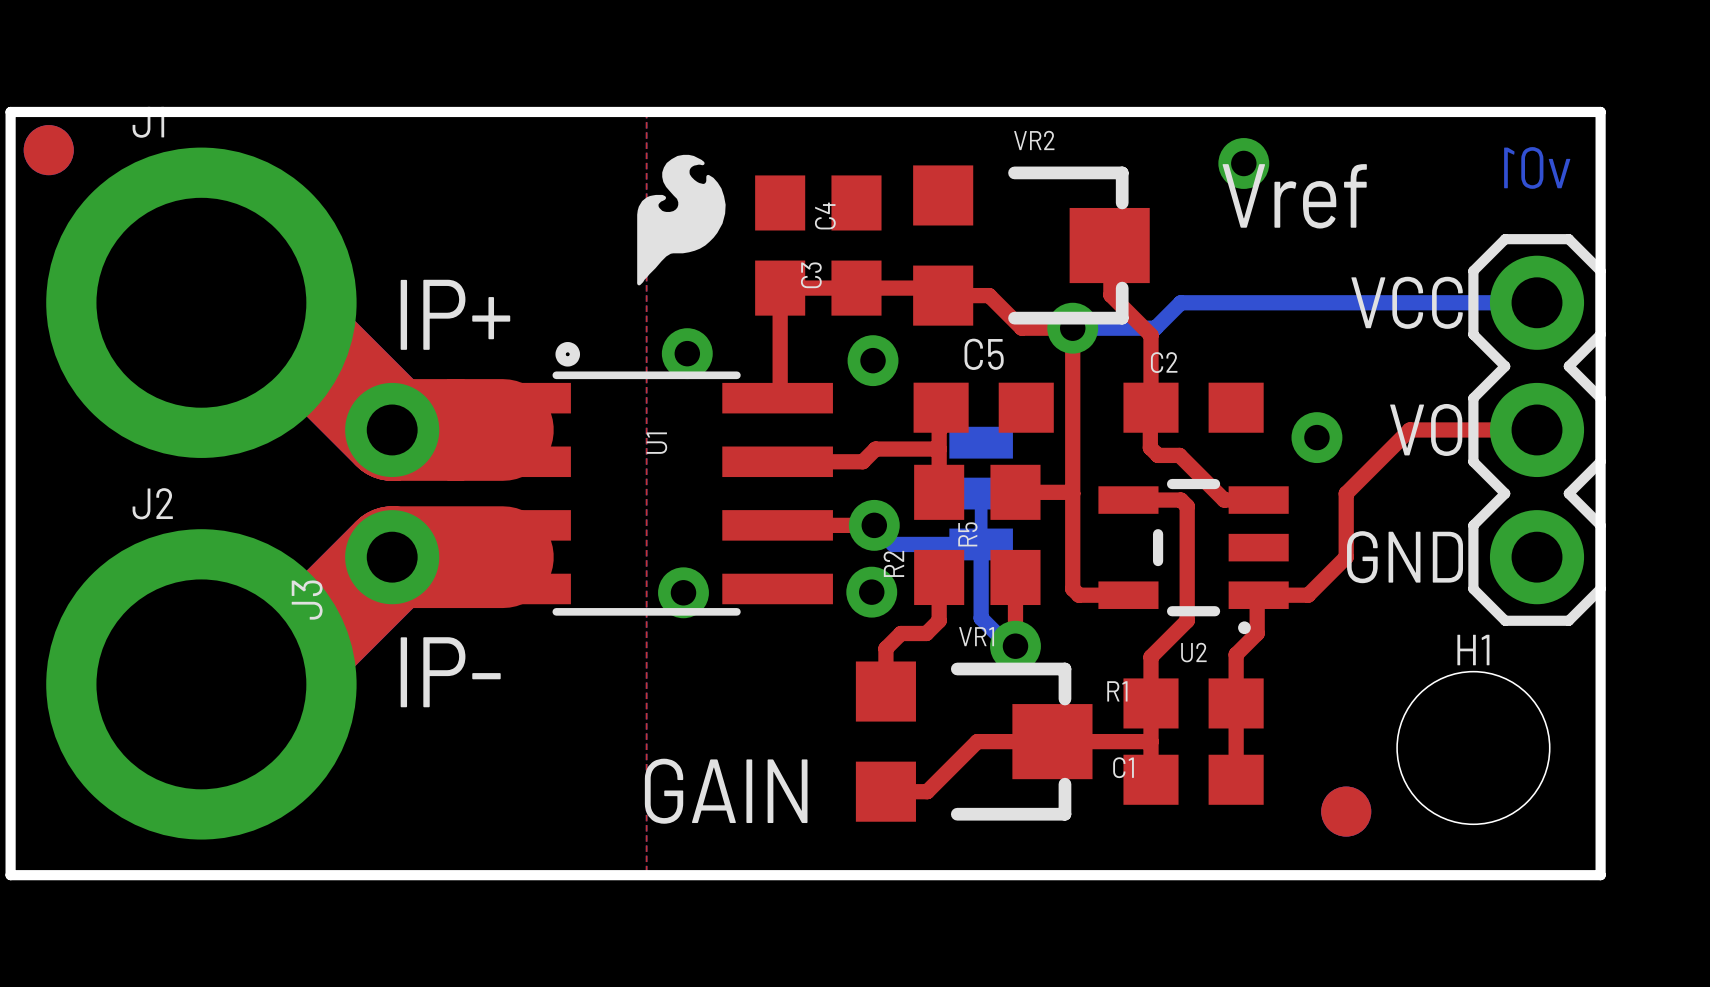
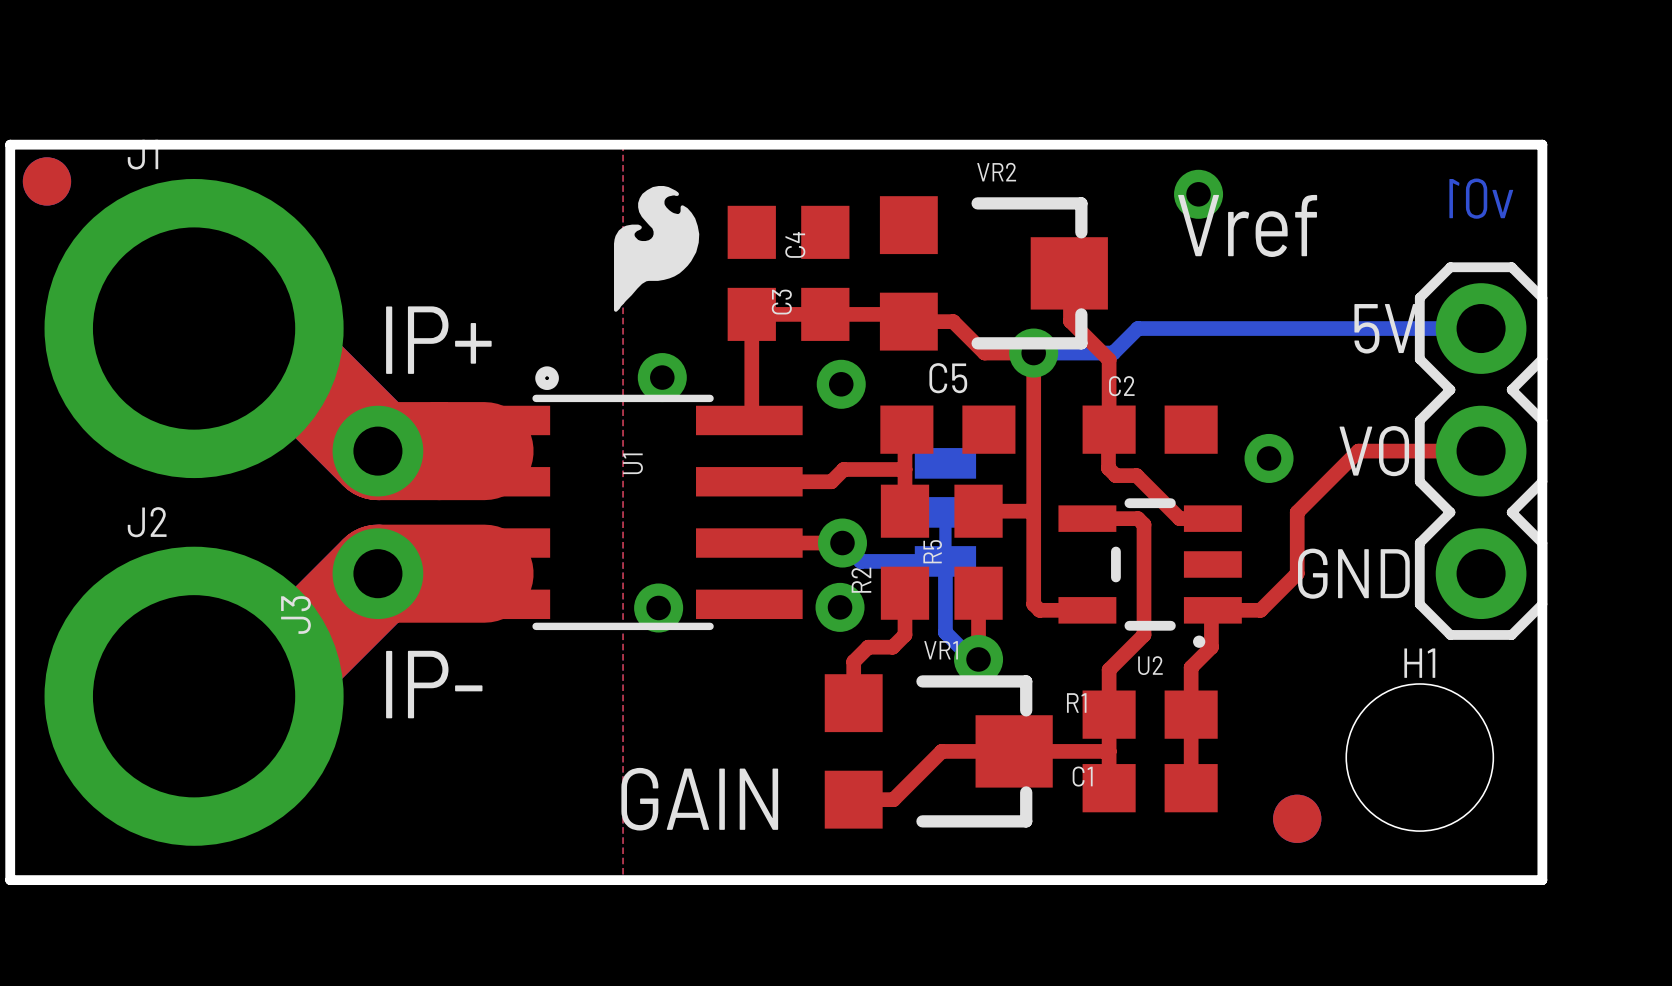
text: VCC (1407, 302) -> 5V (1386, 328)

